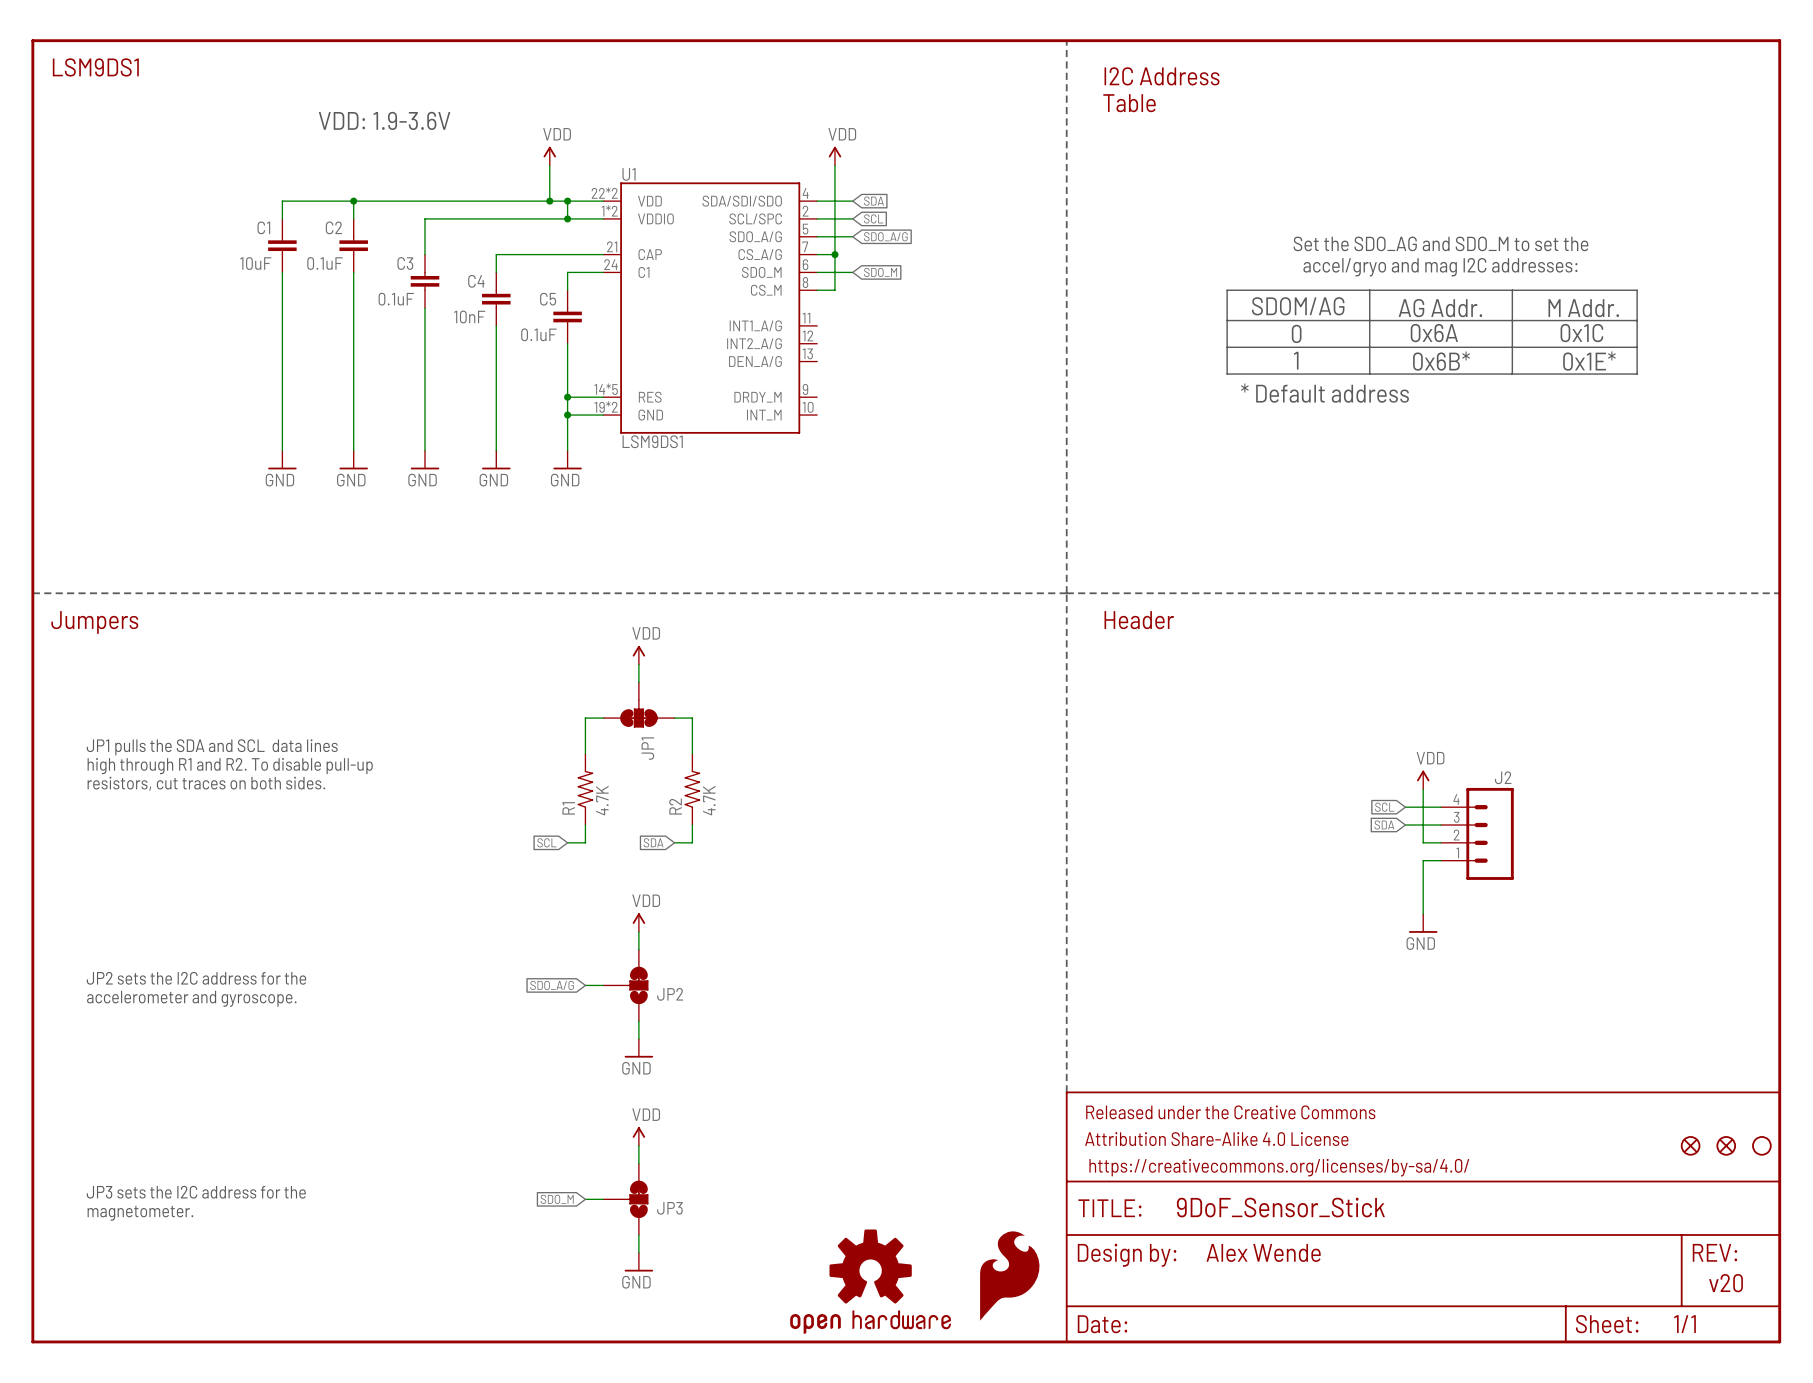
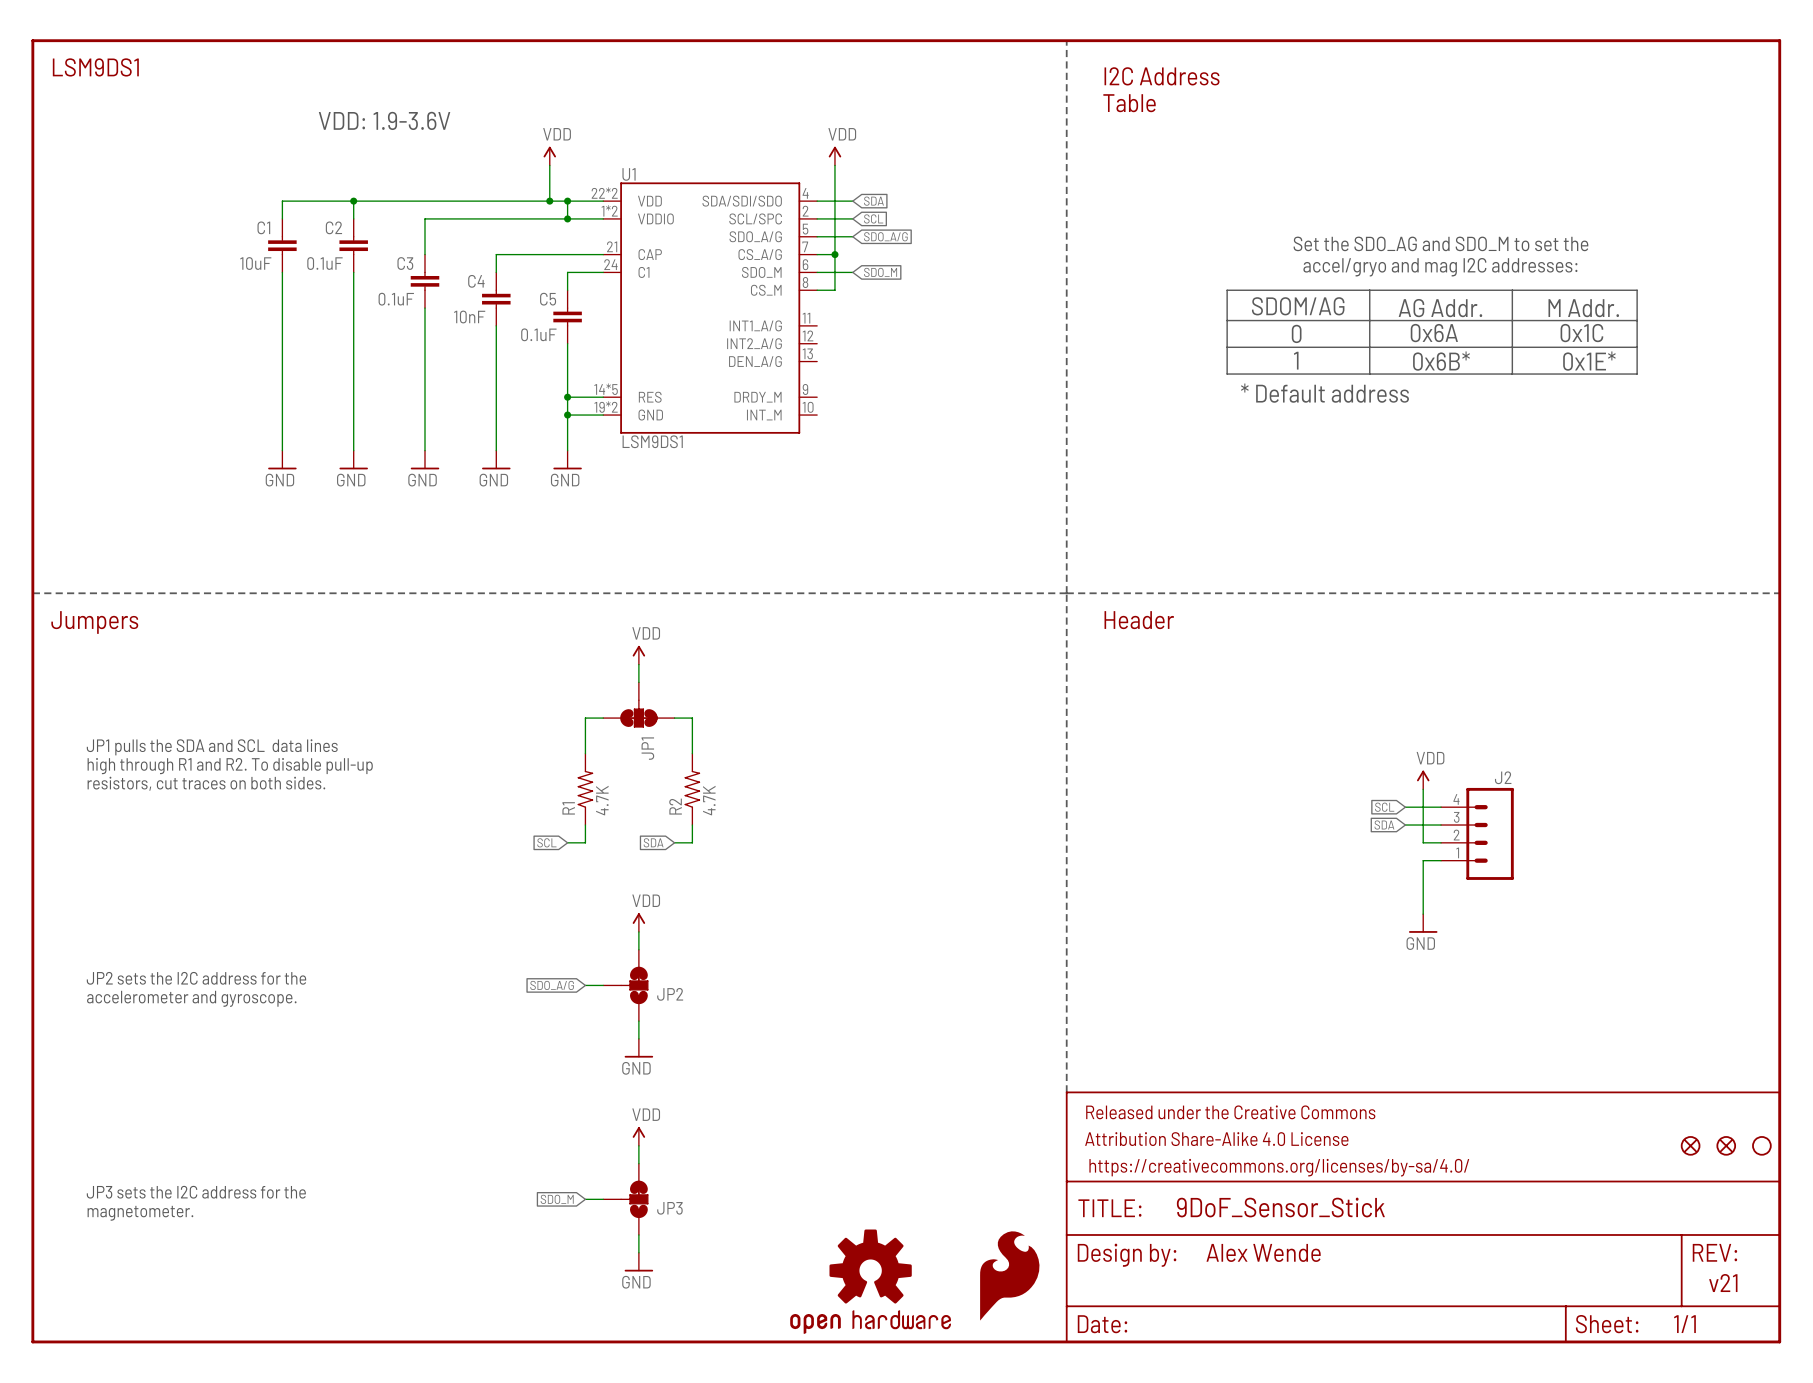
text: v20 (1726, 1283) -> v21 (1723, 1283)

